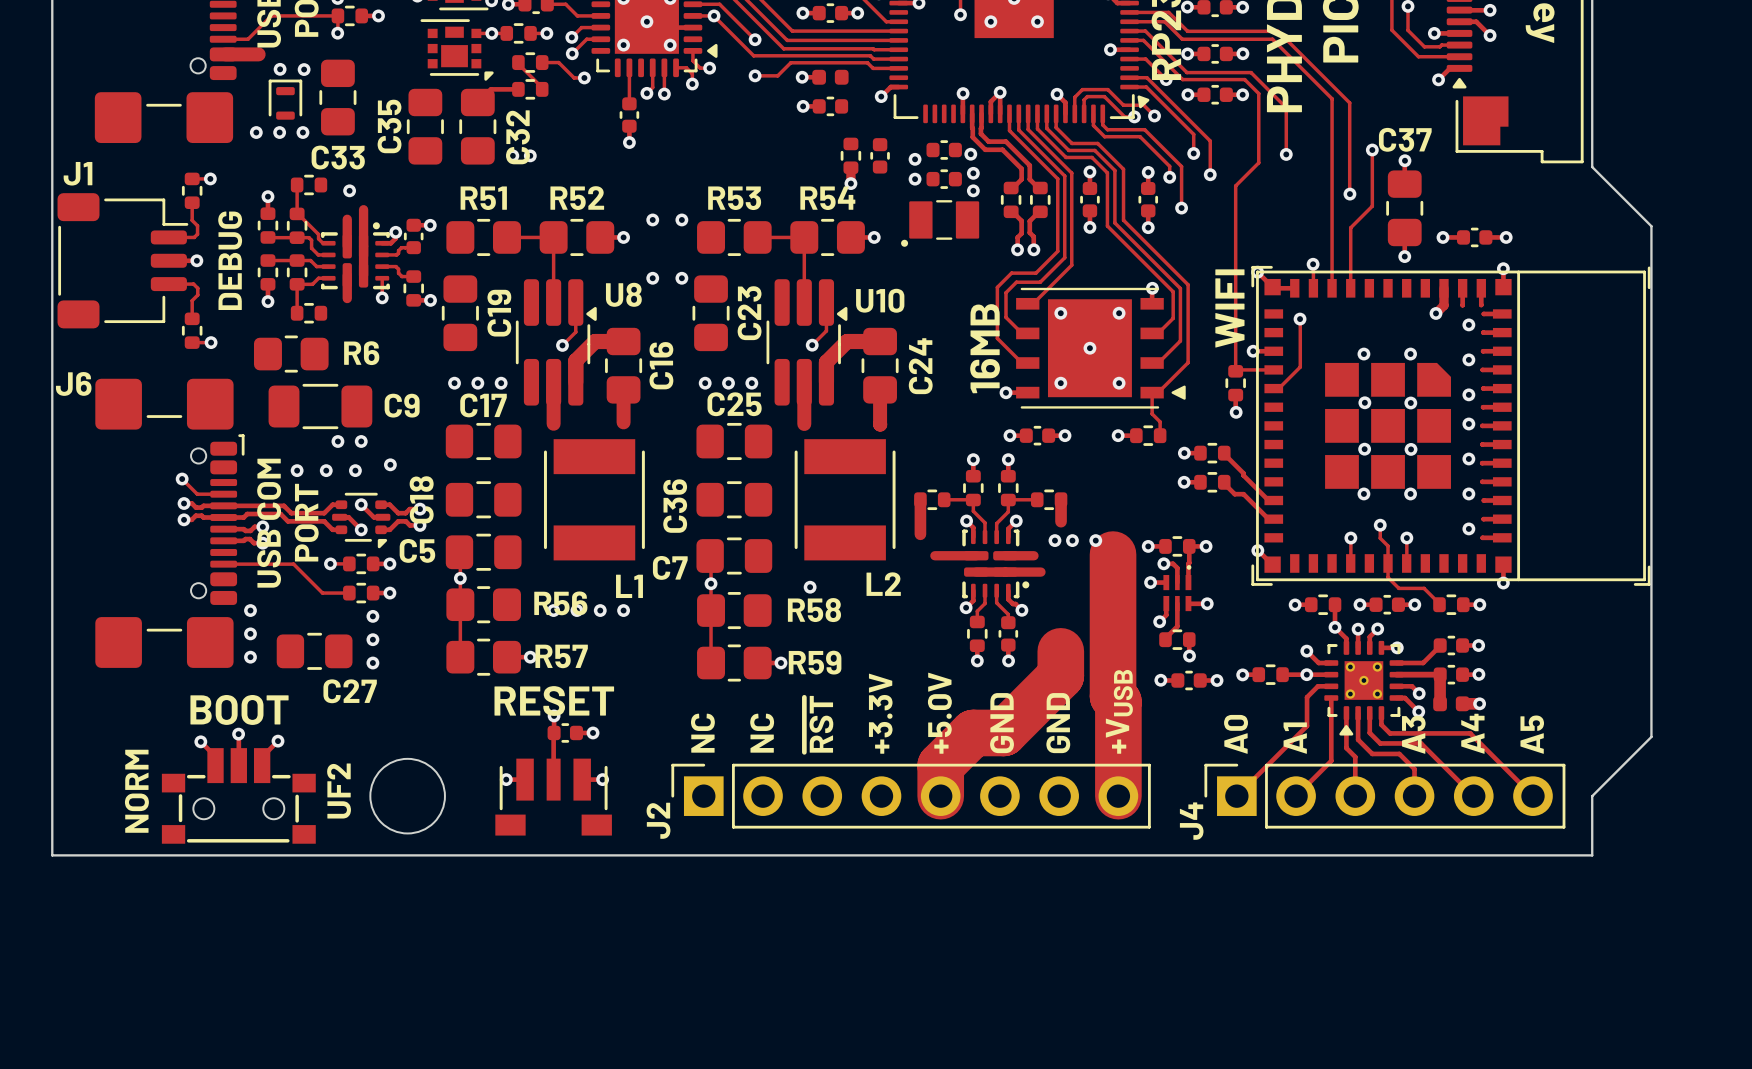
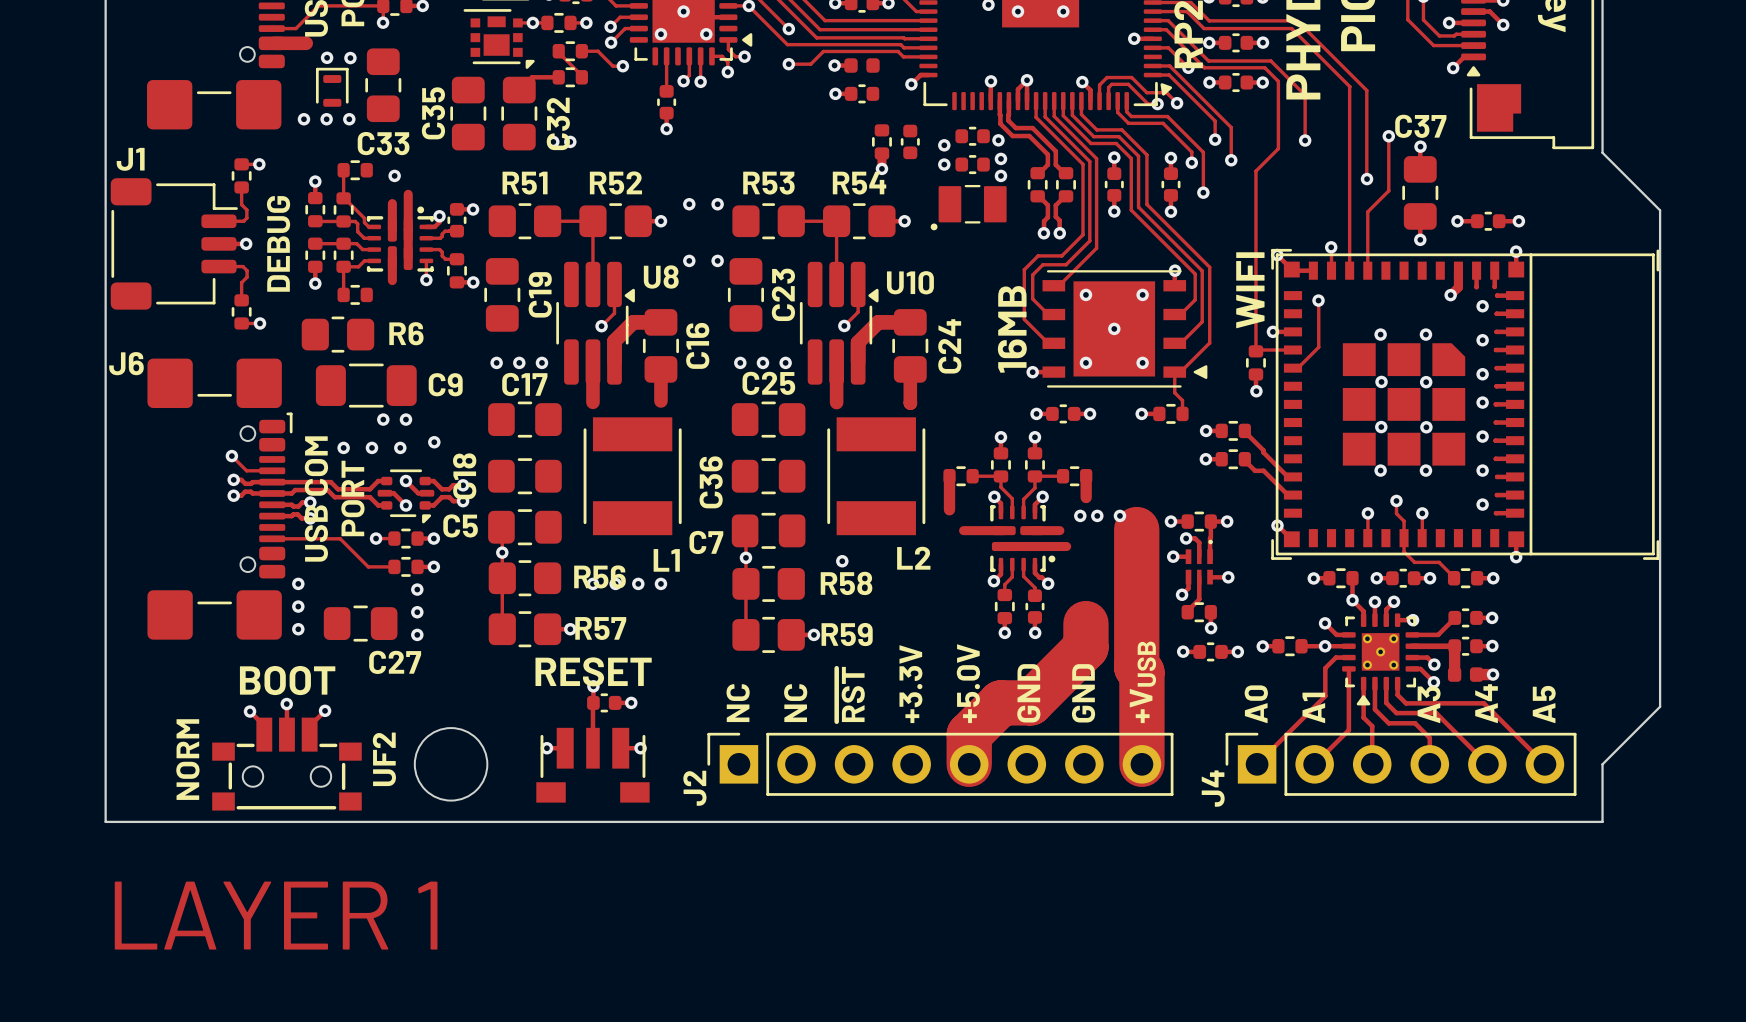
text: none -> LAYER 1 (276, 915)

